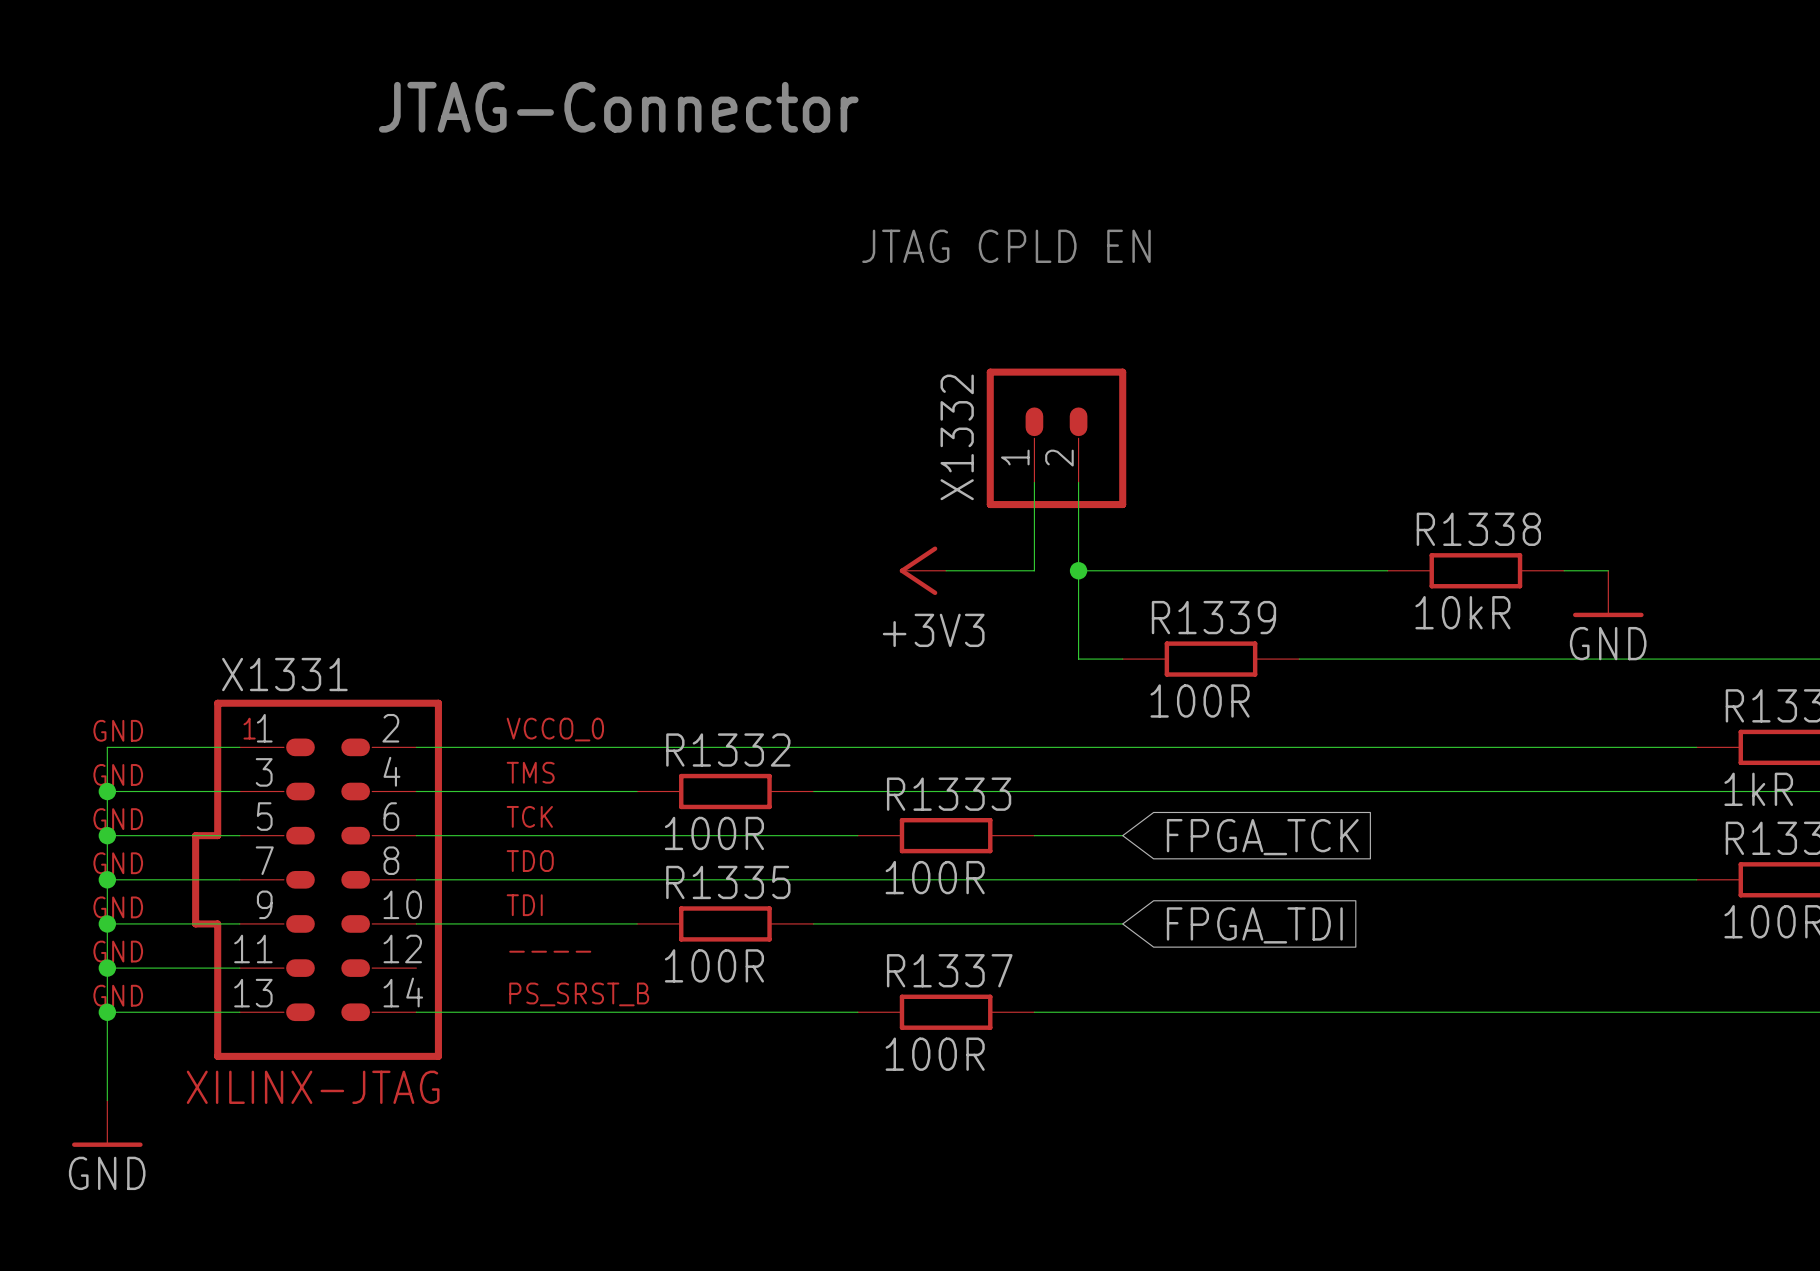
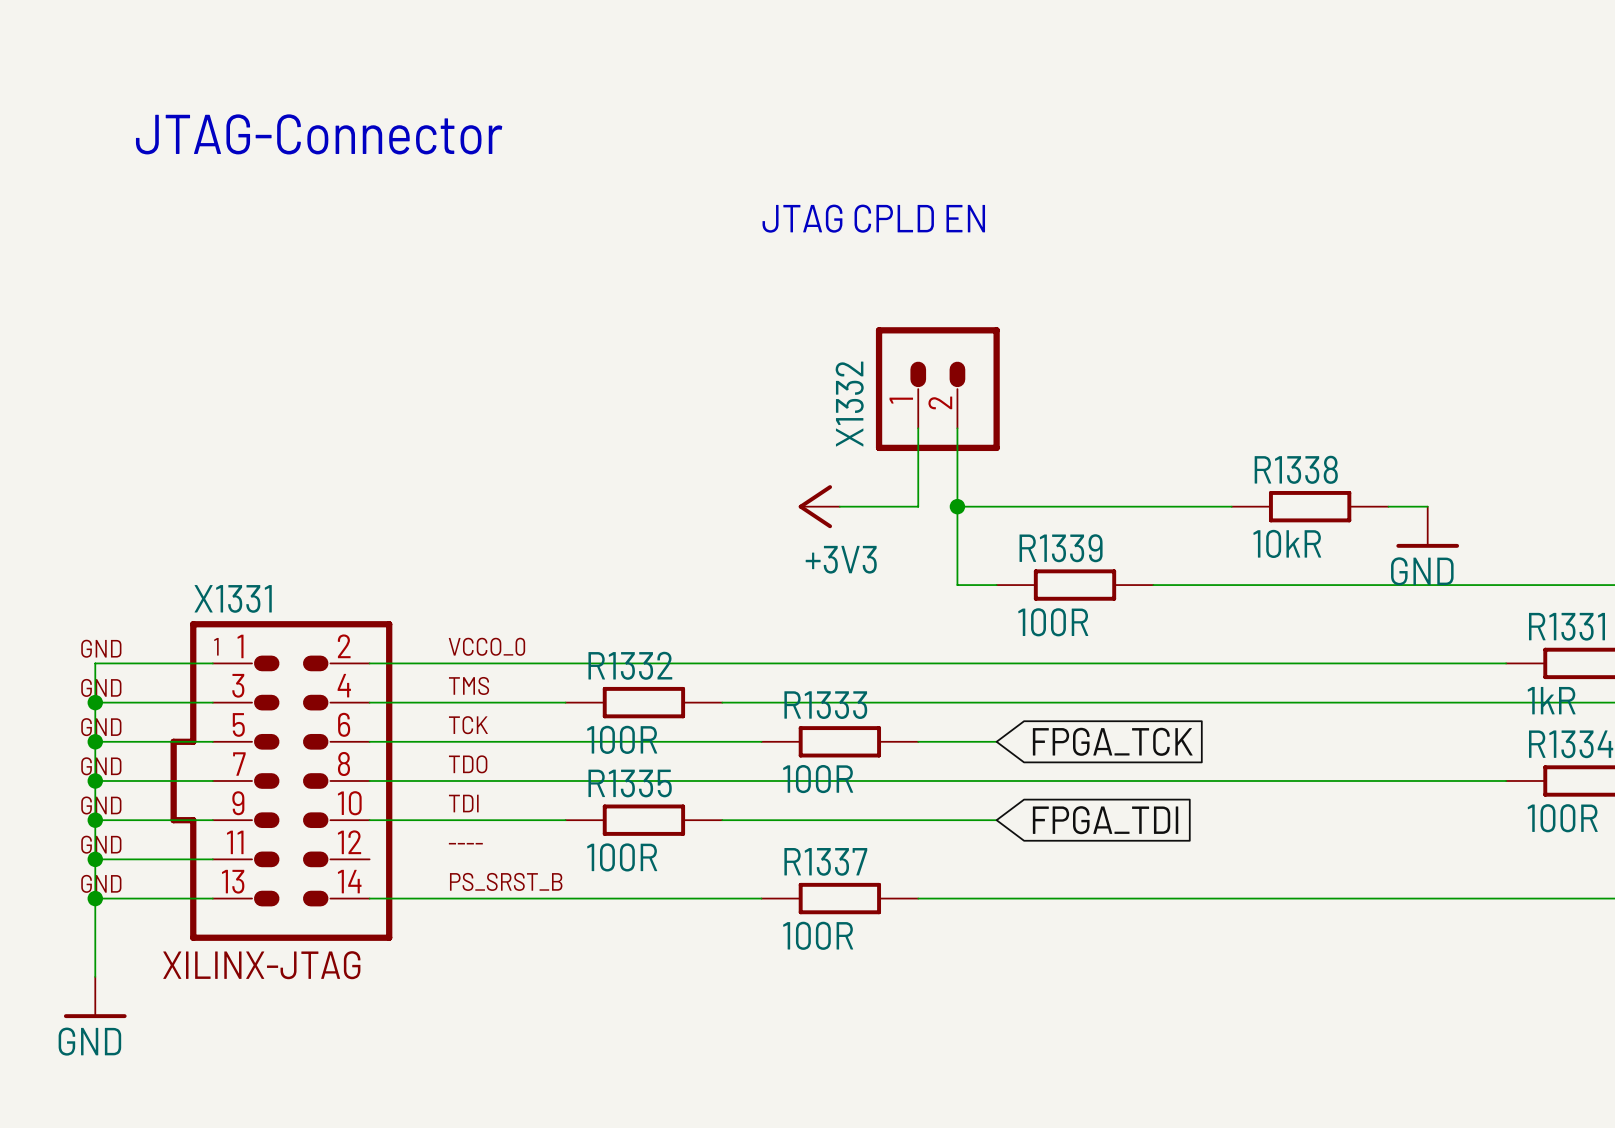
text position: JTAG-Connector (618, 107) -> JTAG-Connector (319, 134)

